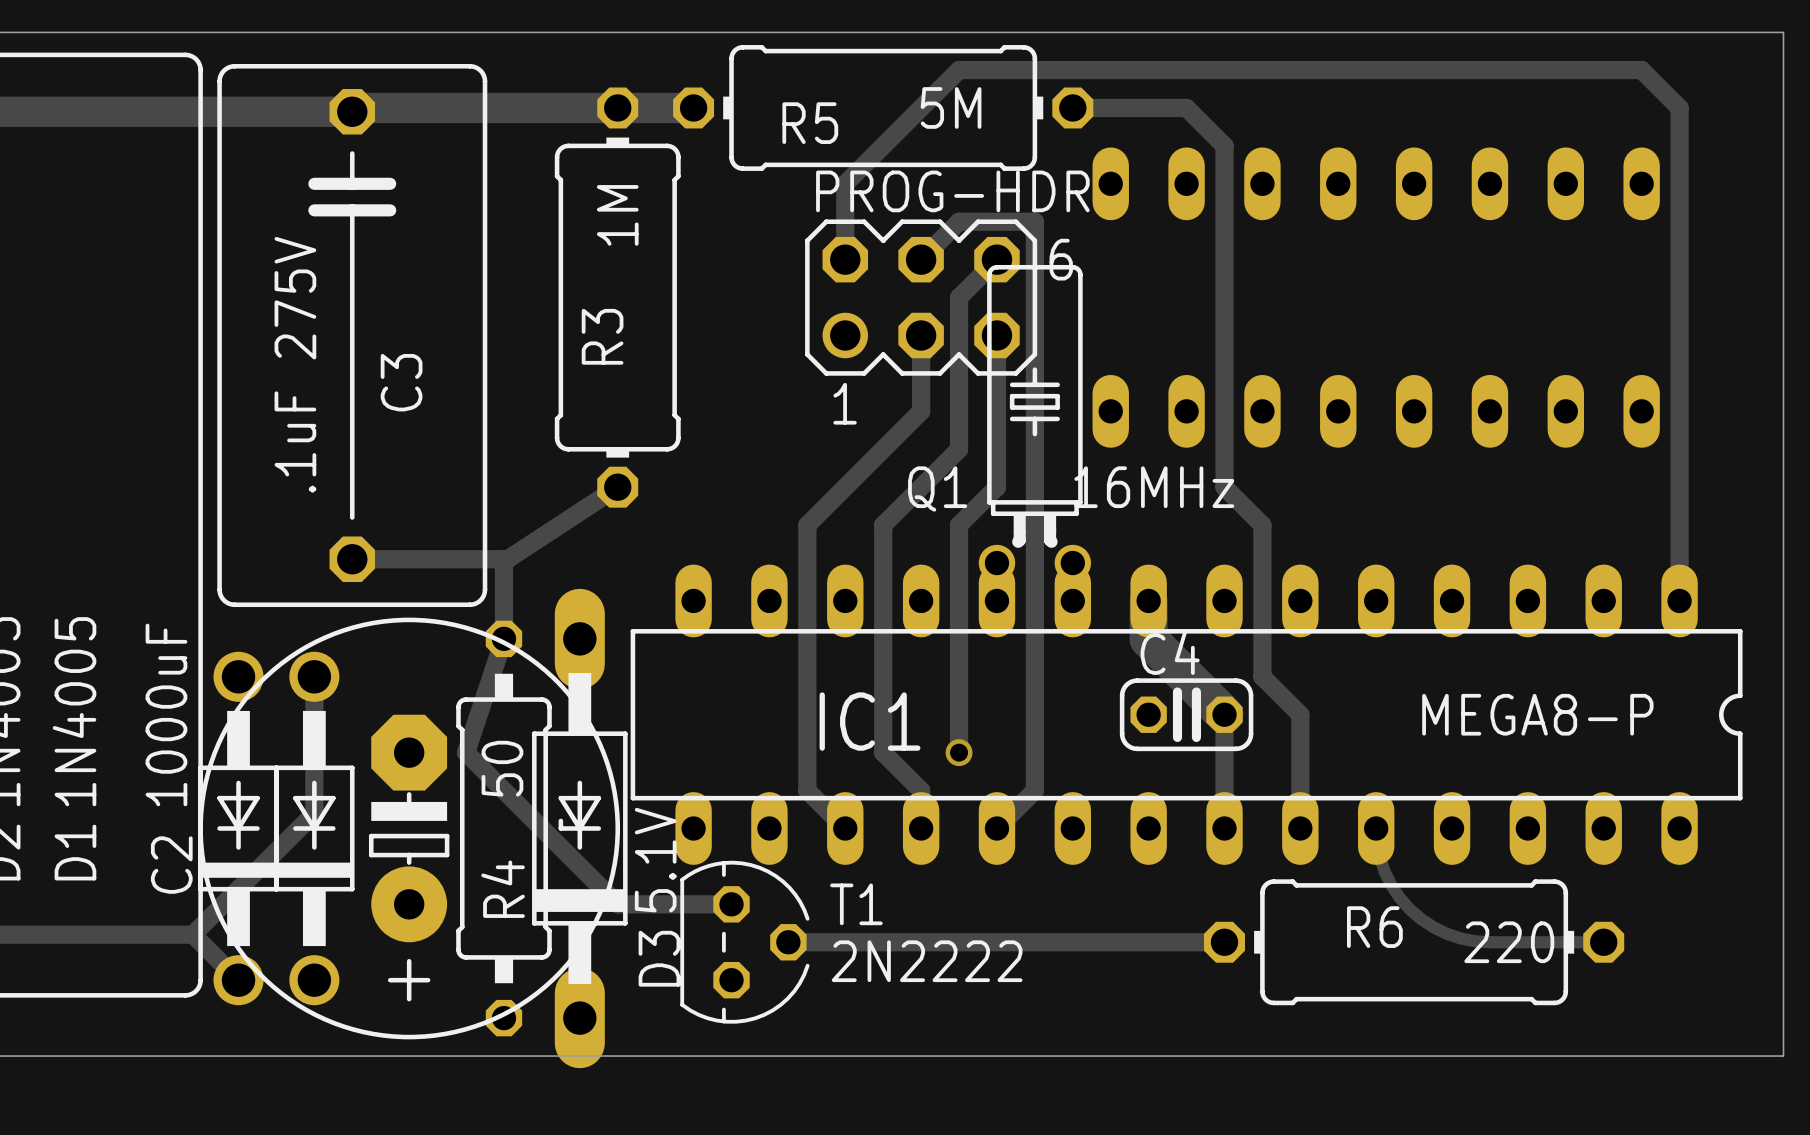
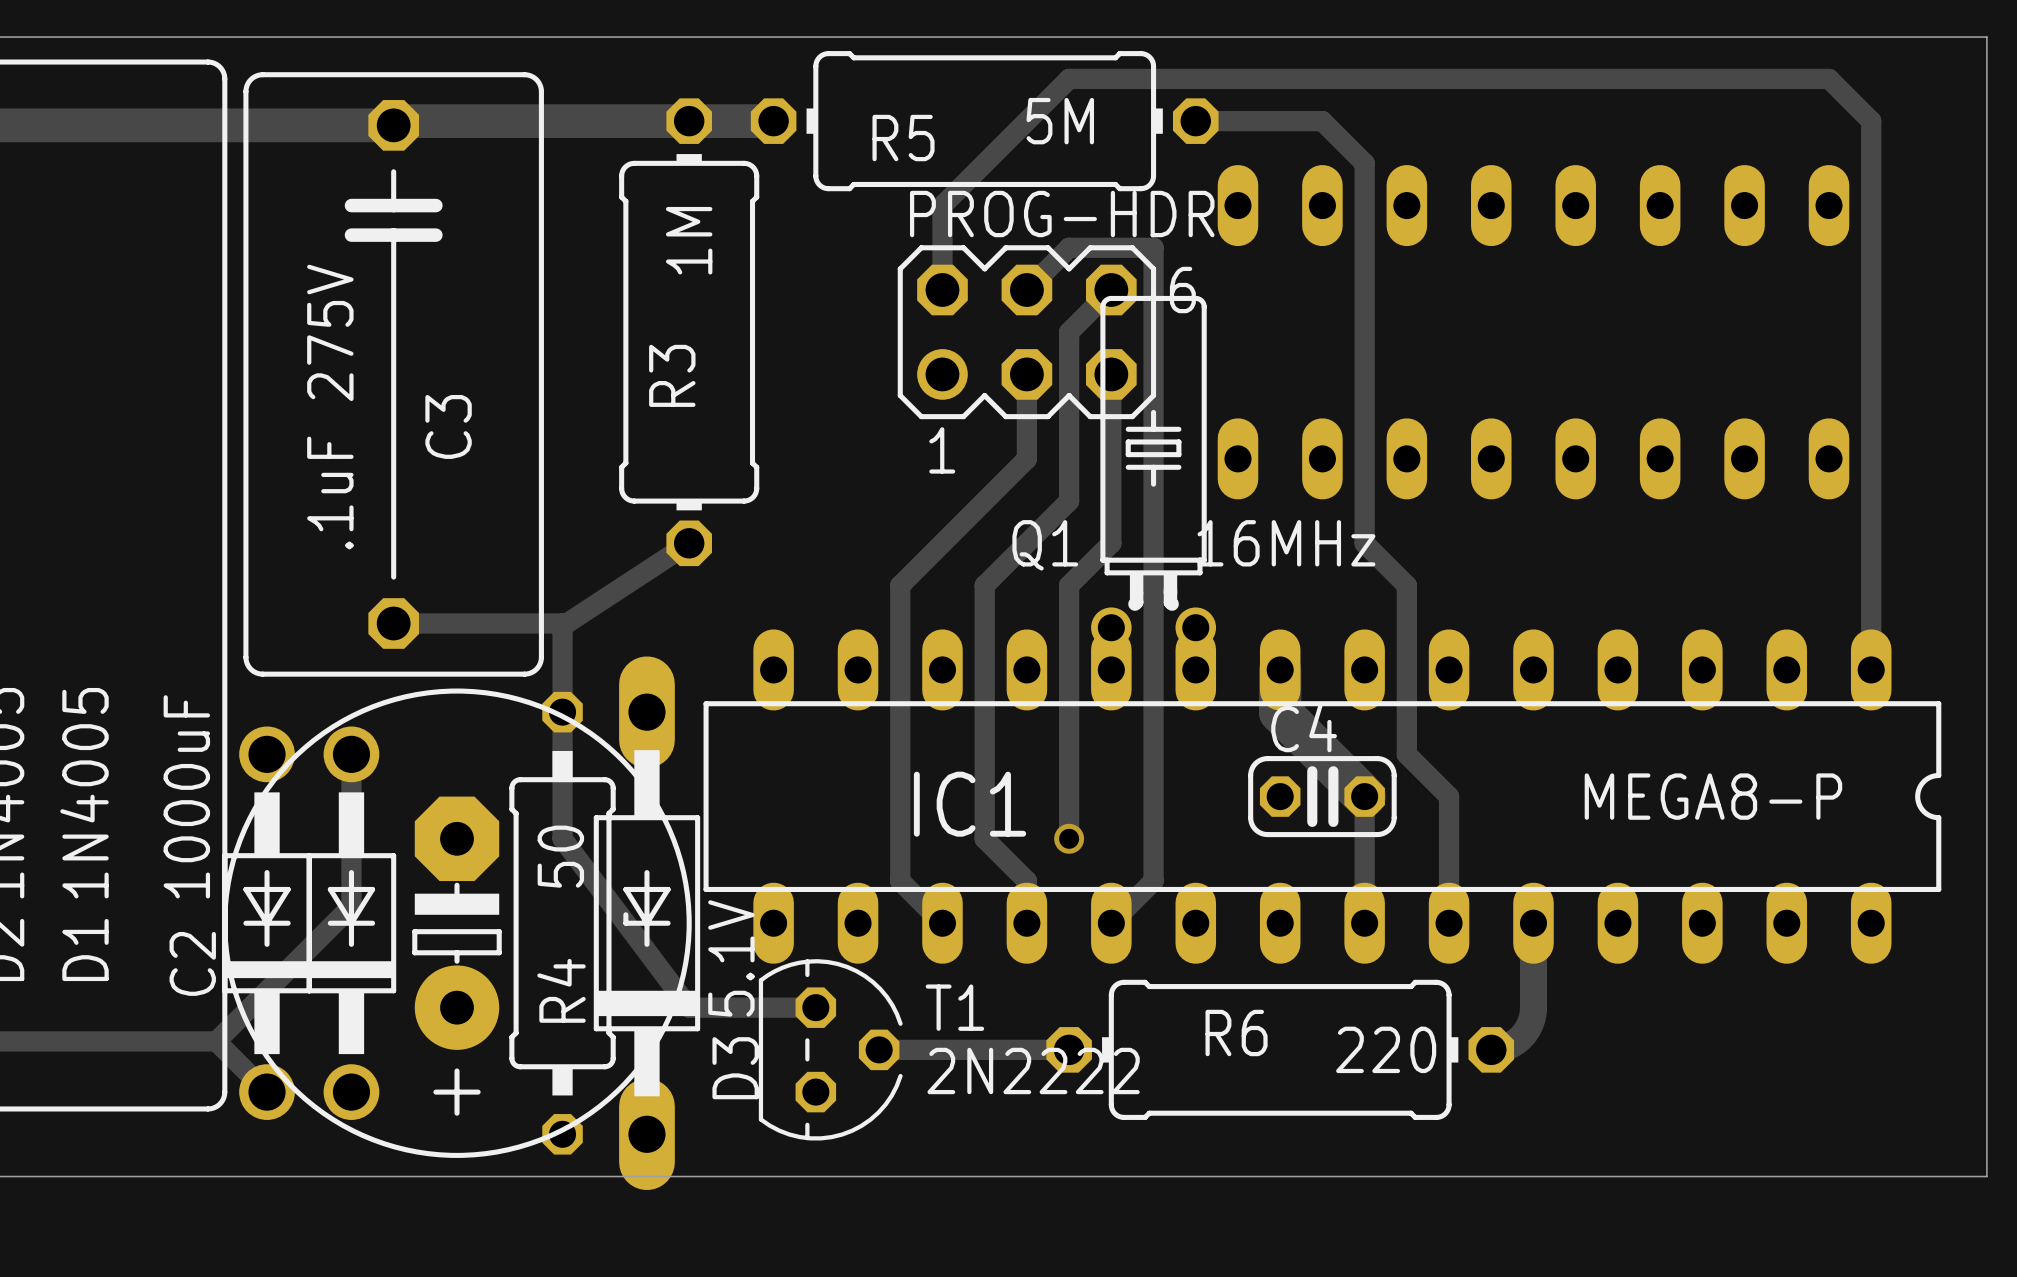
track: (503, 638) (466, 752) (617, 904) -> (562, 712) (562, 838) (689, 1007)
track: (1376, 828) (1380, 857) (1391, 885) (1409, 908) (1433, 927) (1446, 933) (1475, 941) (1603, 942) -> (1533, 923) (1532, 1018) (1527, 1028) (1516, 1041) (1507, 1046) (1491, 1049)
track: (959, 942) (1224, 942) -> none
R6 position: (1414, 942) -> (1280, 1049)

